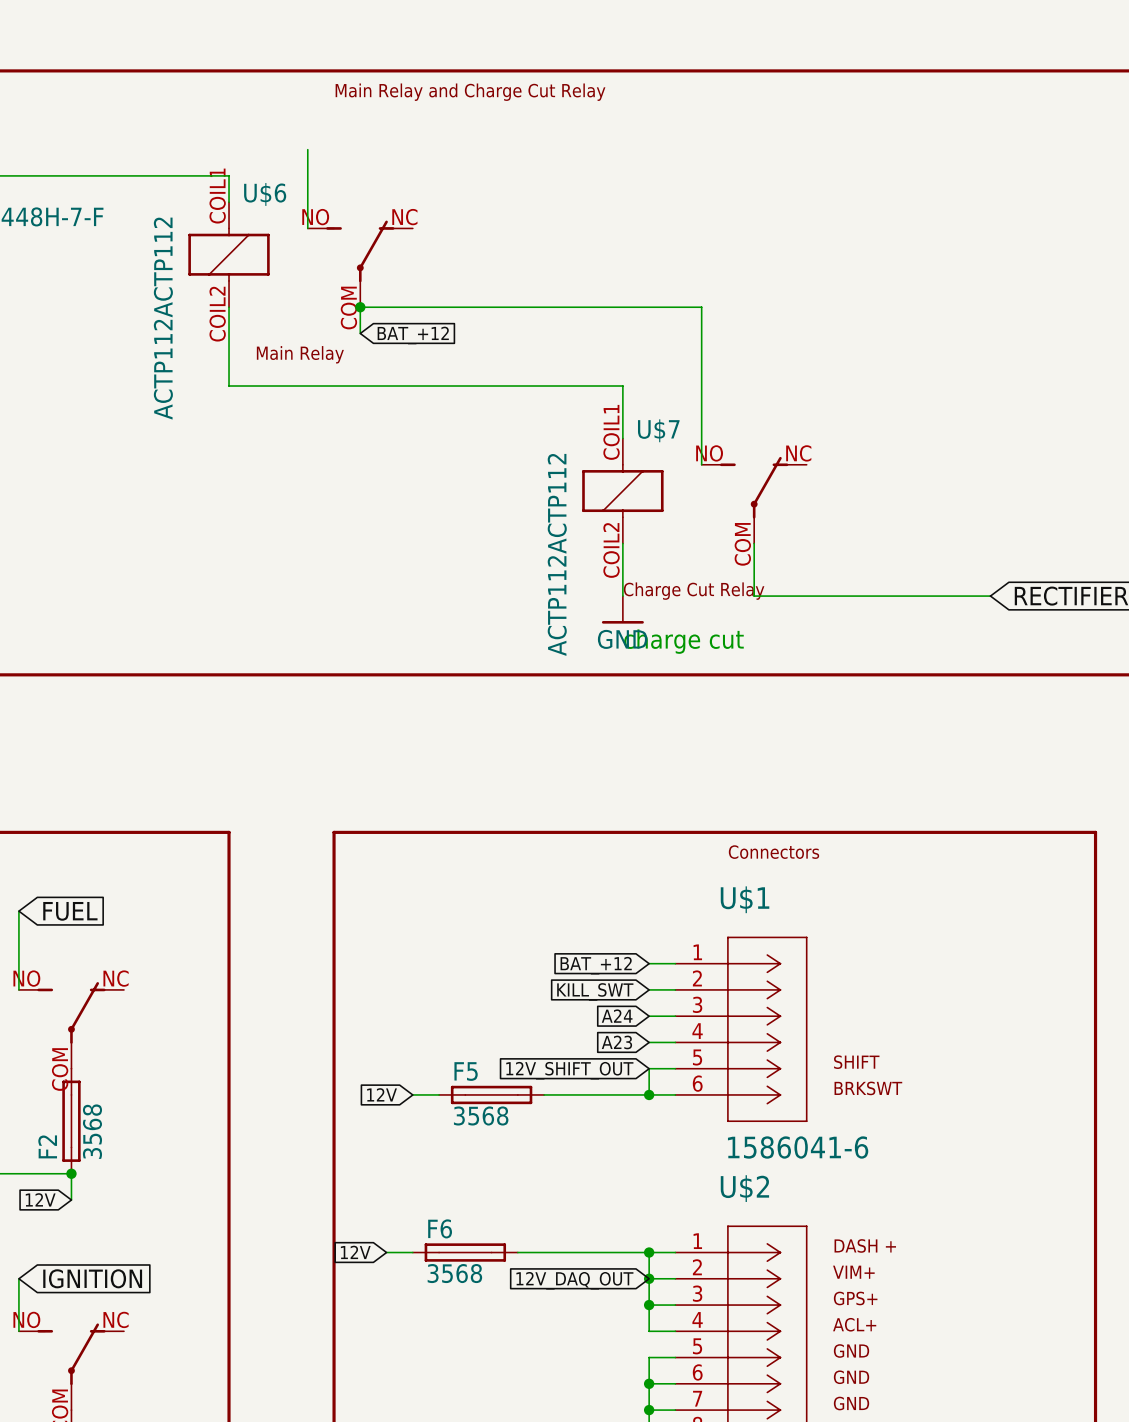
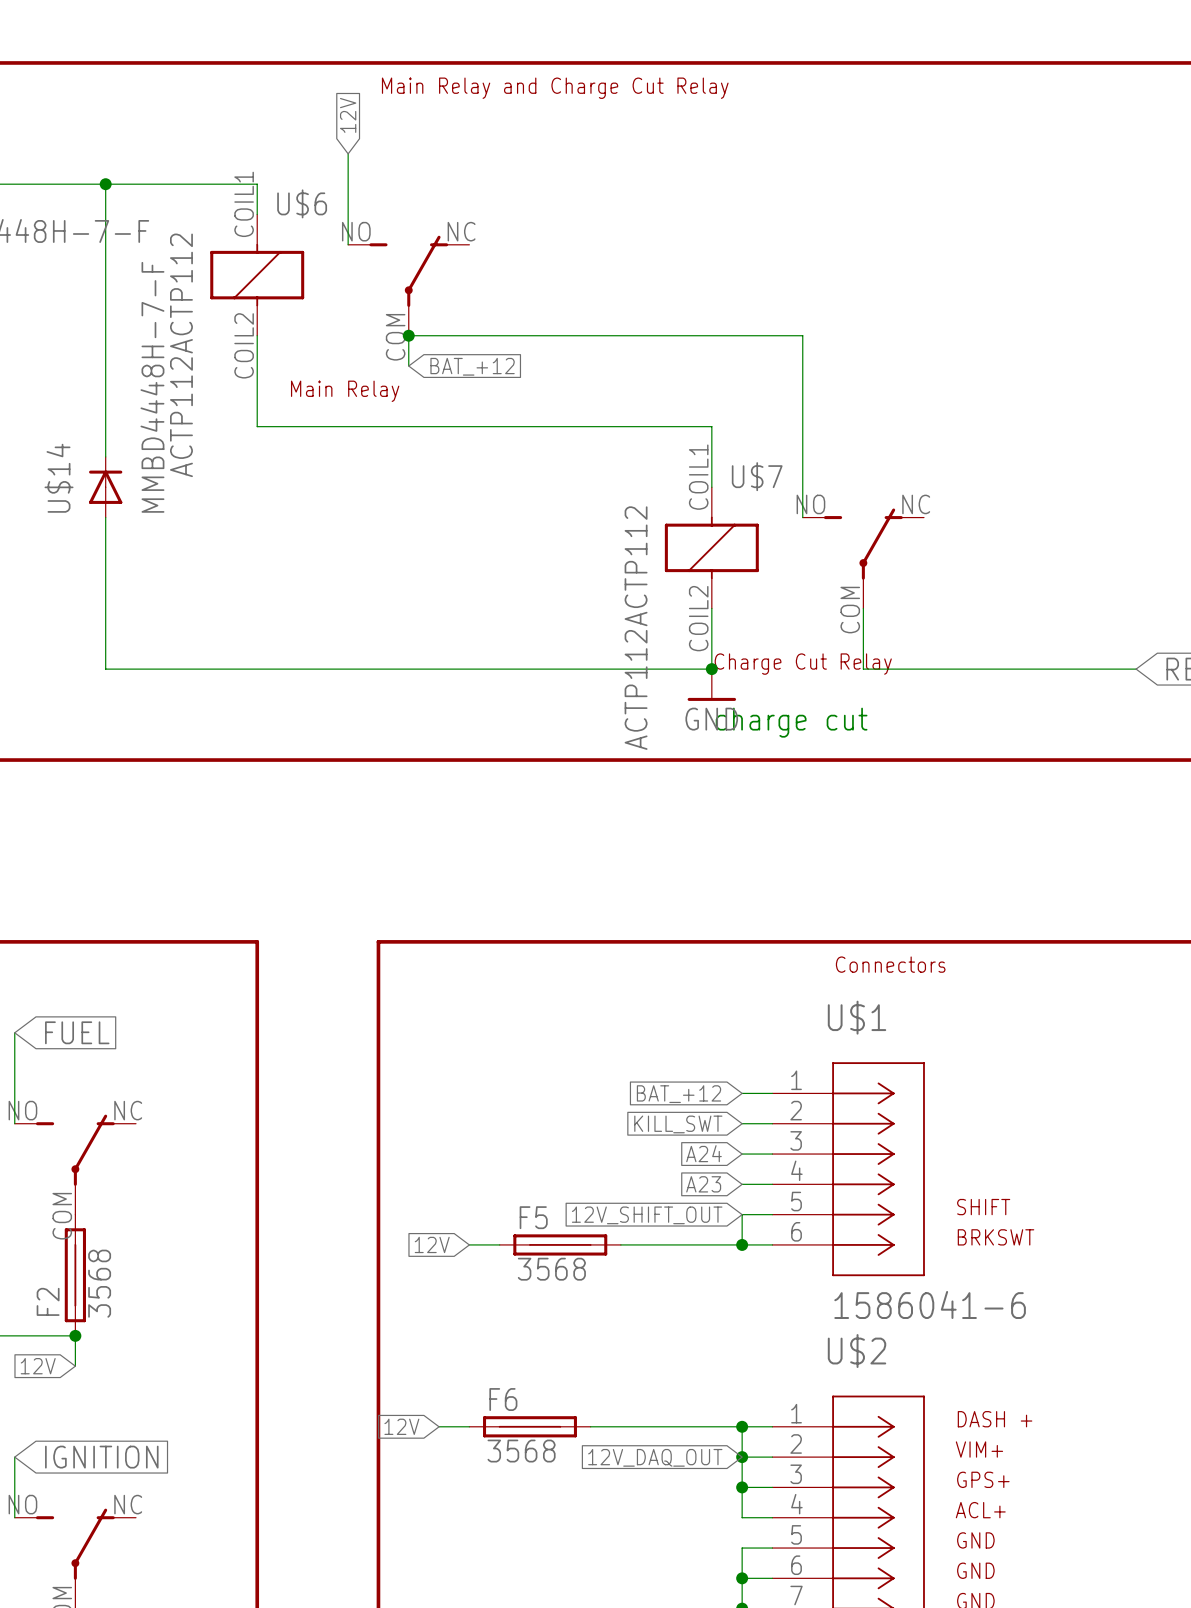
global label: none -> 12V (348, 115)
wire: none -> (105, 184) (105, 456)
junction: none -> (105, 184)
U$14: none -> MMBD4448H-7-F (105, 487)
wire: none -> (105, 517) (105, 669) (711, 669)
junction: none -> (711, 669)

